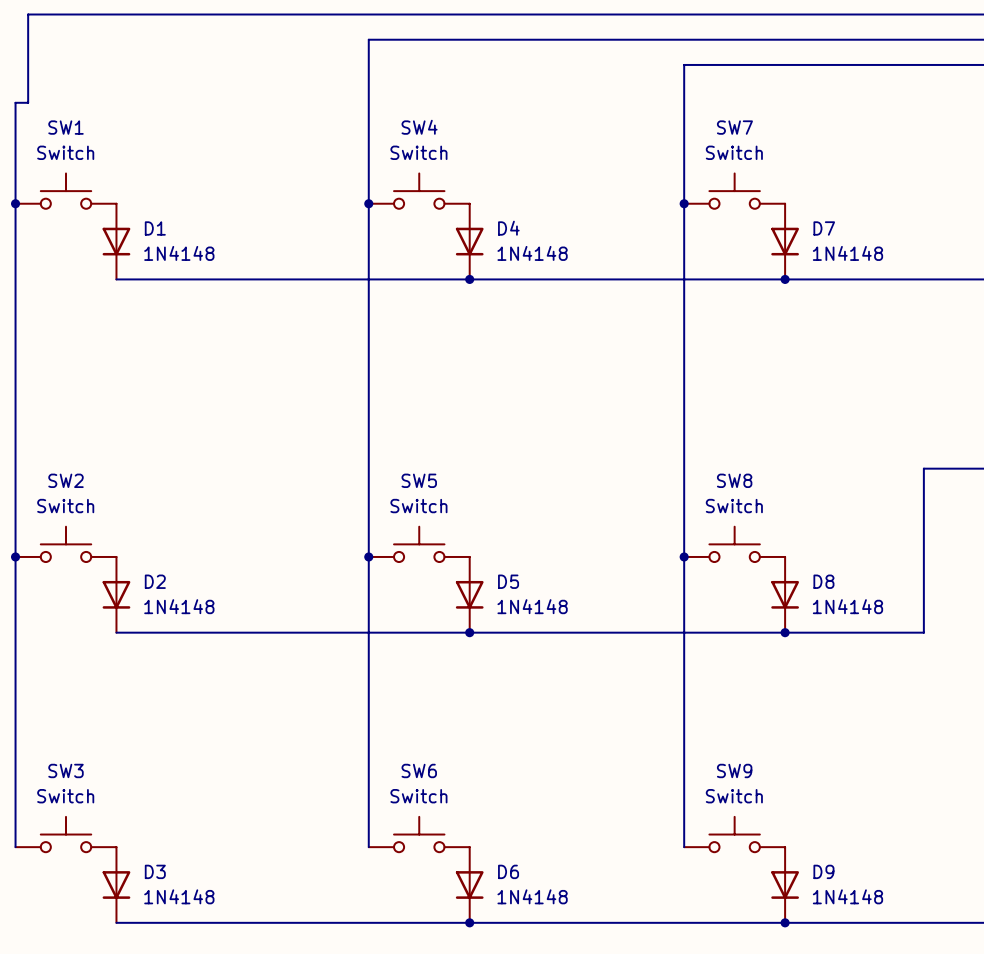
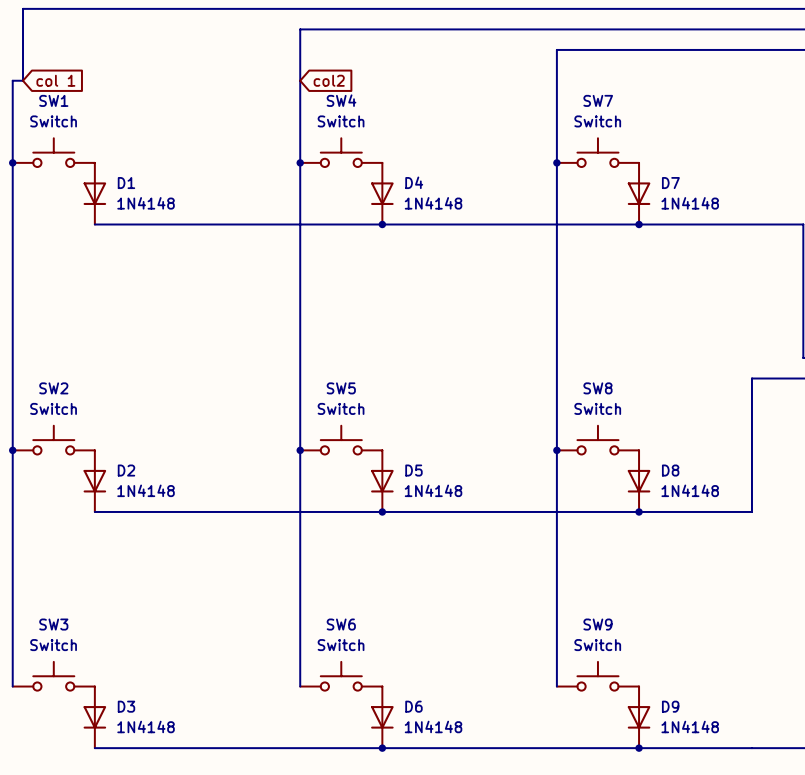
global label: none -> col 1 (55, 80)
global label: none -> col2 (329, 80)

